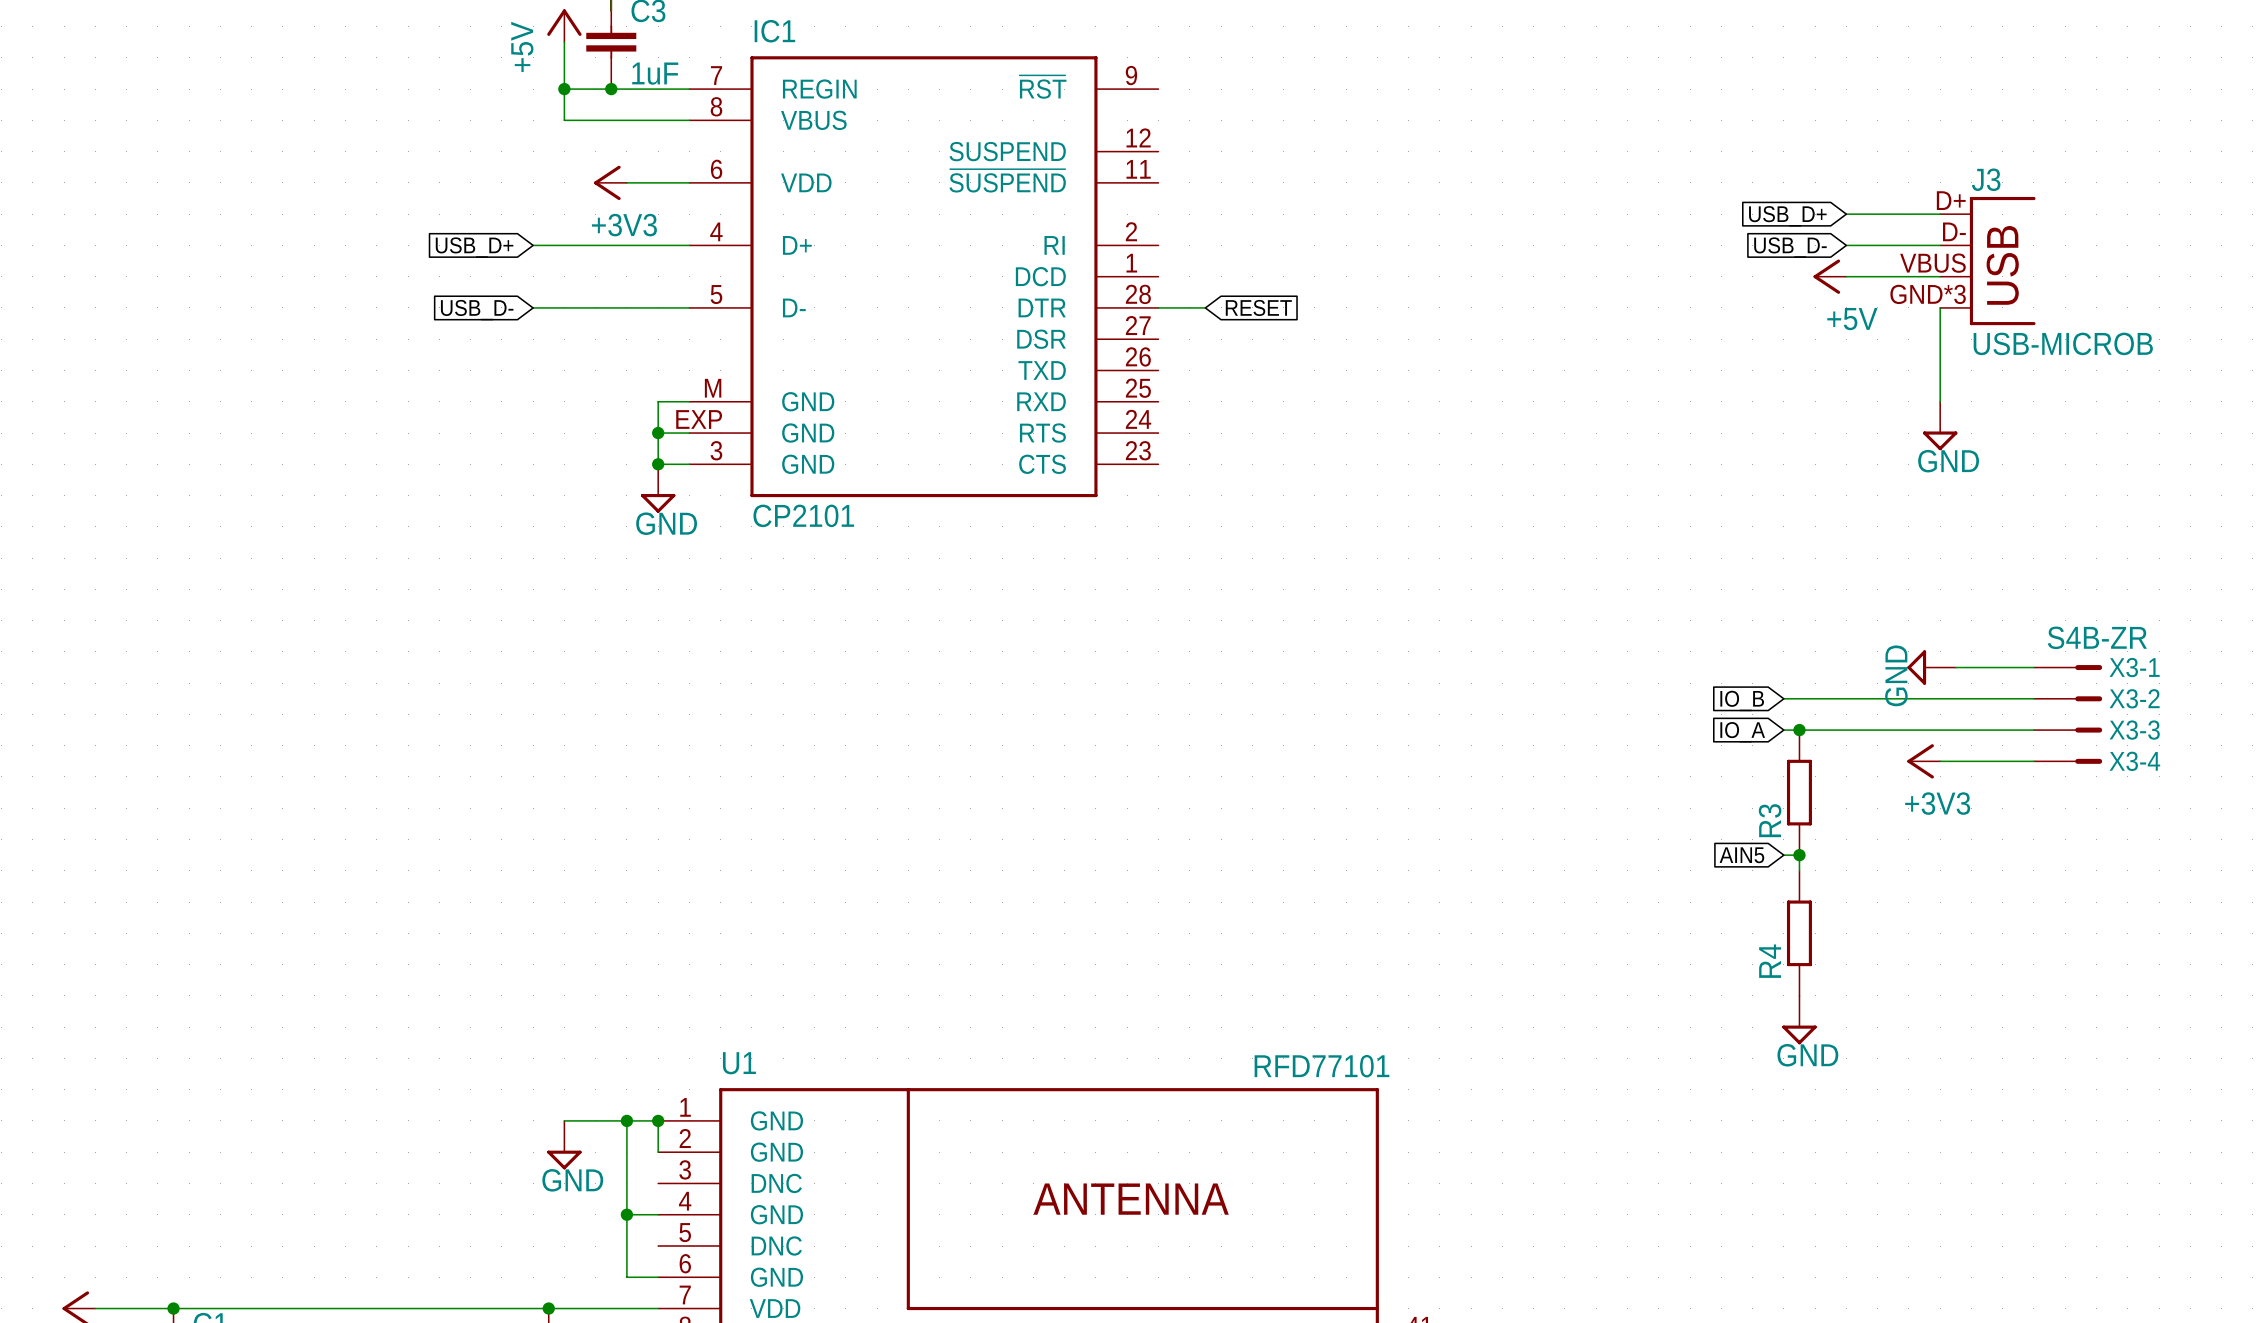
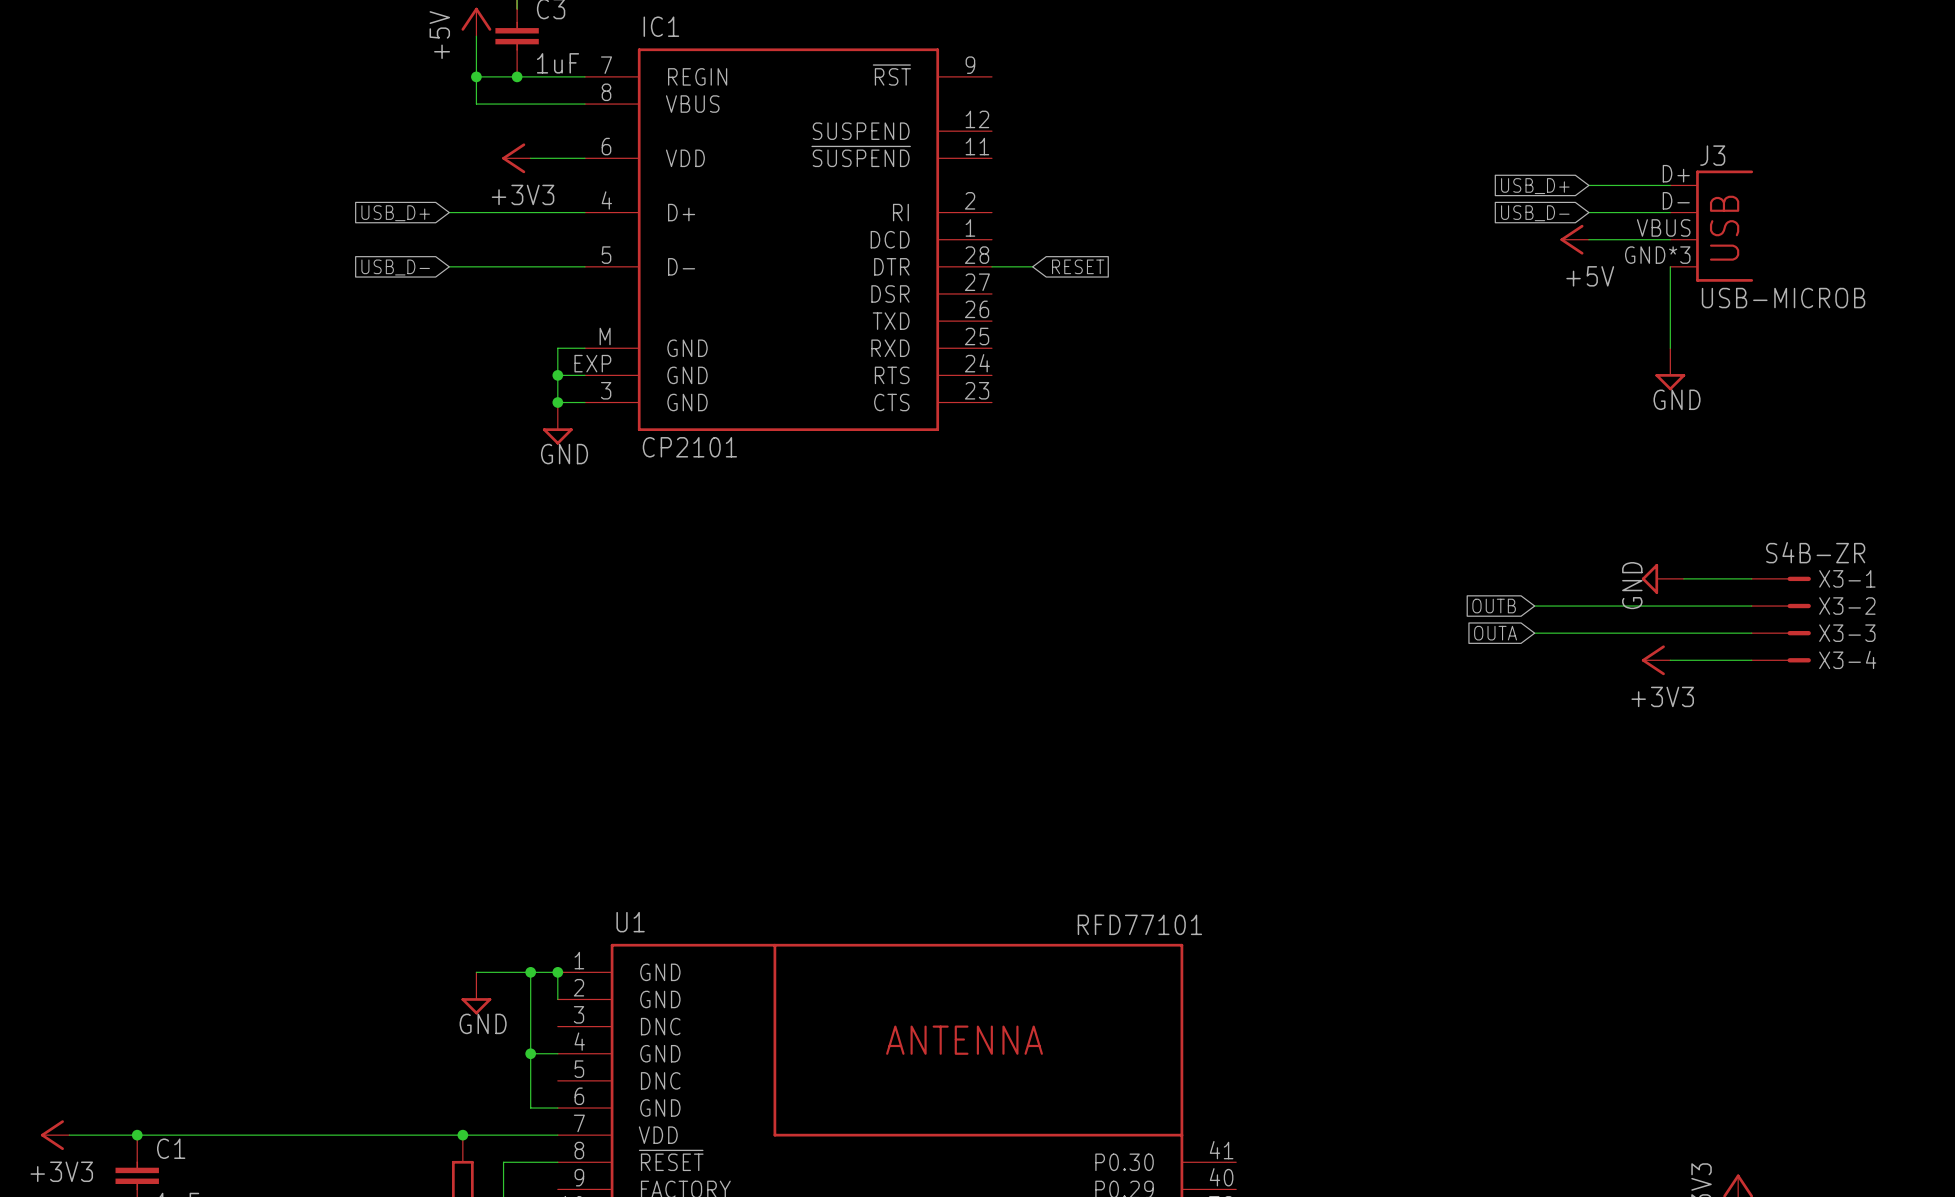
global label: IO_B (1742, 700) -> OUTB (1494, 606)
junction: (1799, 730) -> none
global label: IO_A (1742, 732) -> OUTA (1495, 633)
R3: (1799, 792) -> none
global label: AIN5 (1741, 855) -> none
wire: (1783, 855) (1799, 855) (1799, 870) -> none
junction: (1799, 855) -> none
R4: (1799, 933) -> none
power symbol: GND (1799, 1020) -> none

